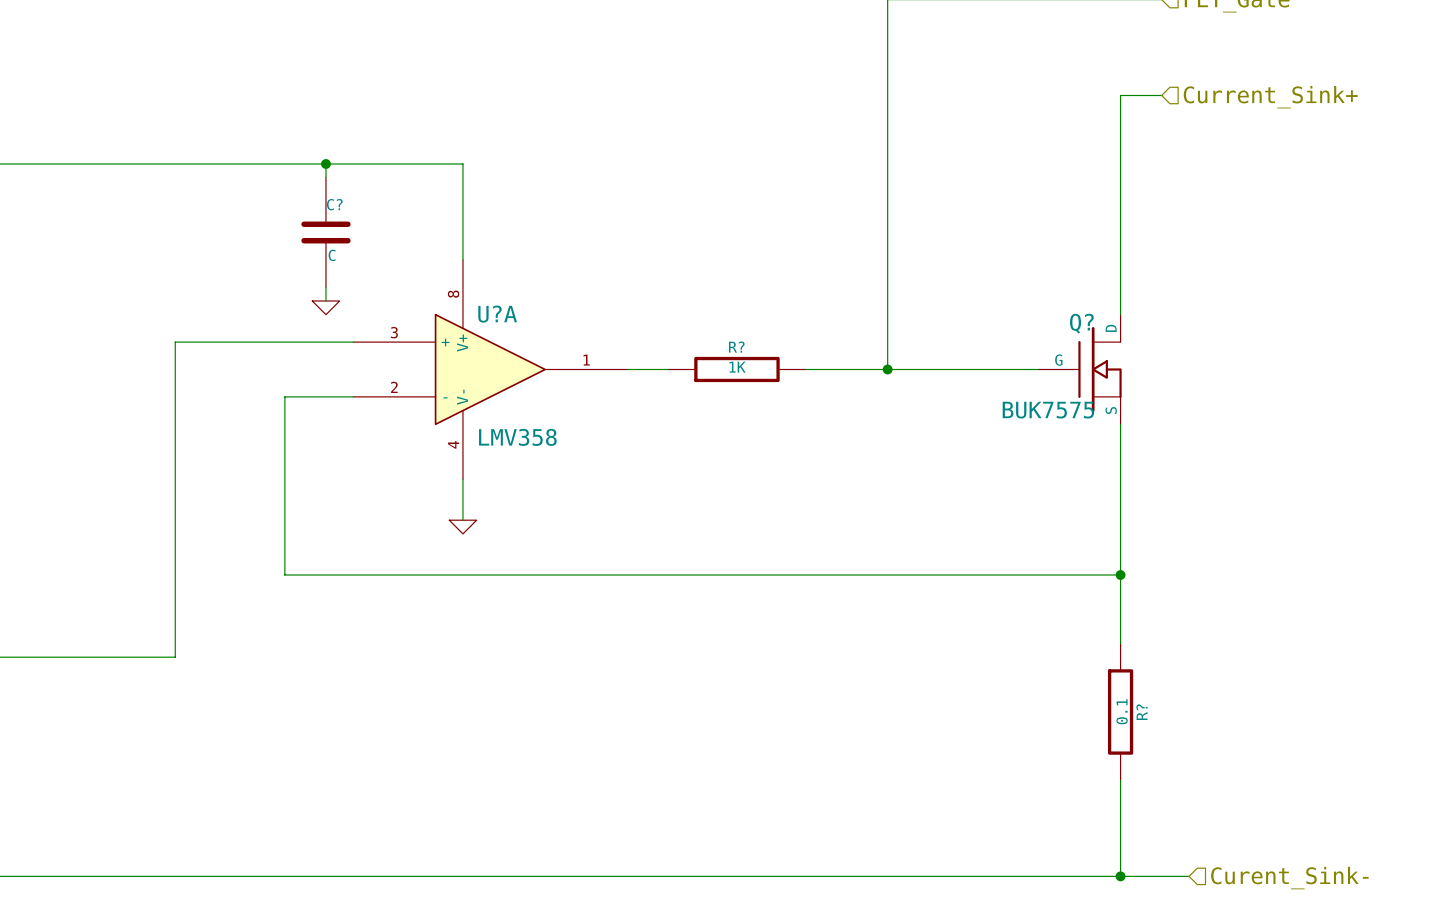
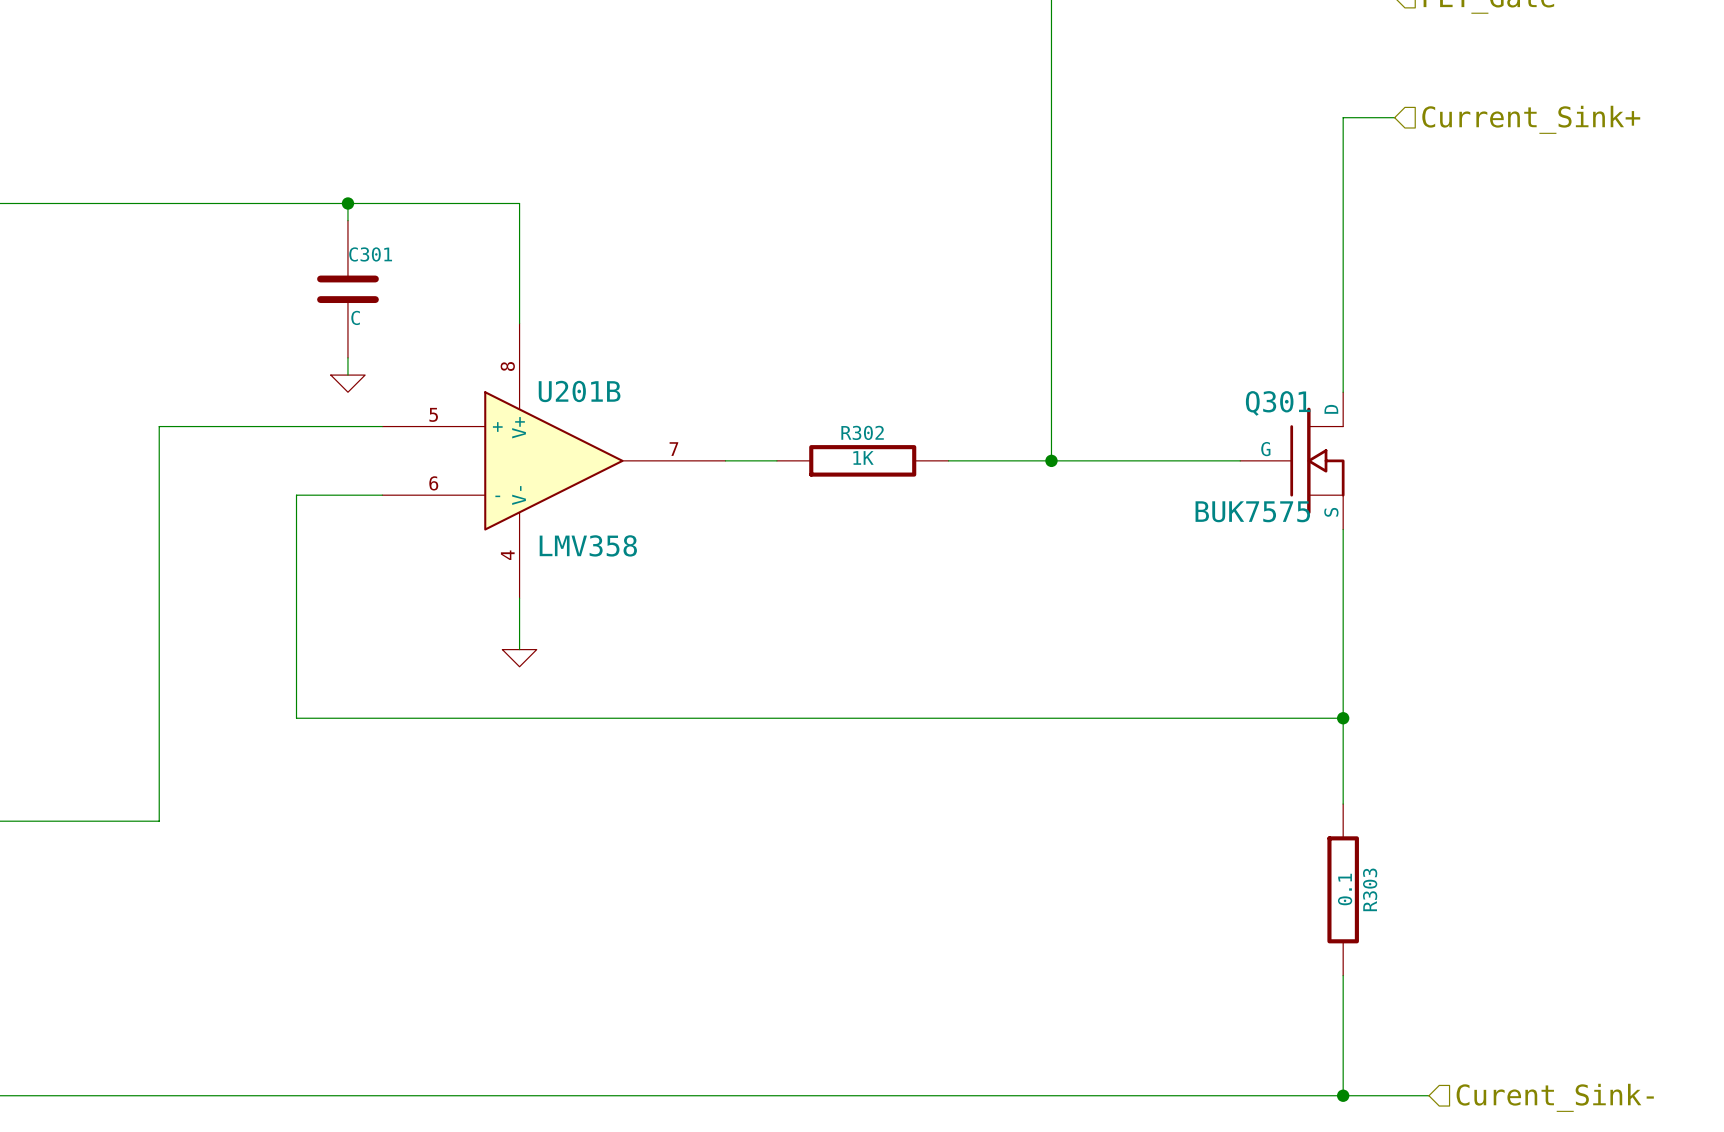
C? name: C? (334, 204) -> C301 (370, 254)
U?A name: U?A (497, 314) -> U201B (579, 391)
Q? name: Q? (1081, 323) -> Q301 (1278, 403)
U?A pin number: 3 (394, 332) -> 5 (433, 414)
R? name: R? (736, 347) -> R302 (862, 432)
U?A pin number: 1 (586, 360) -> 7 (673, 449)
U?A pin number: 2 (394, 387) -> 6 (433, 483)
R? name: R? (1141, 712) -> R303 (1370, 889)

